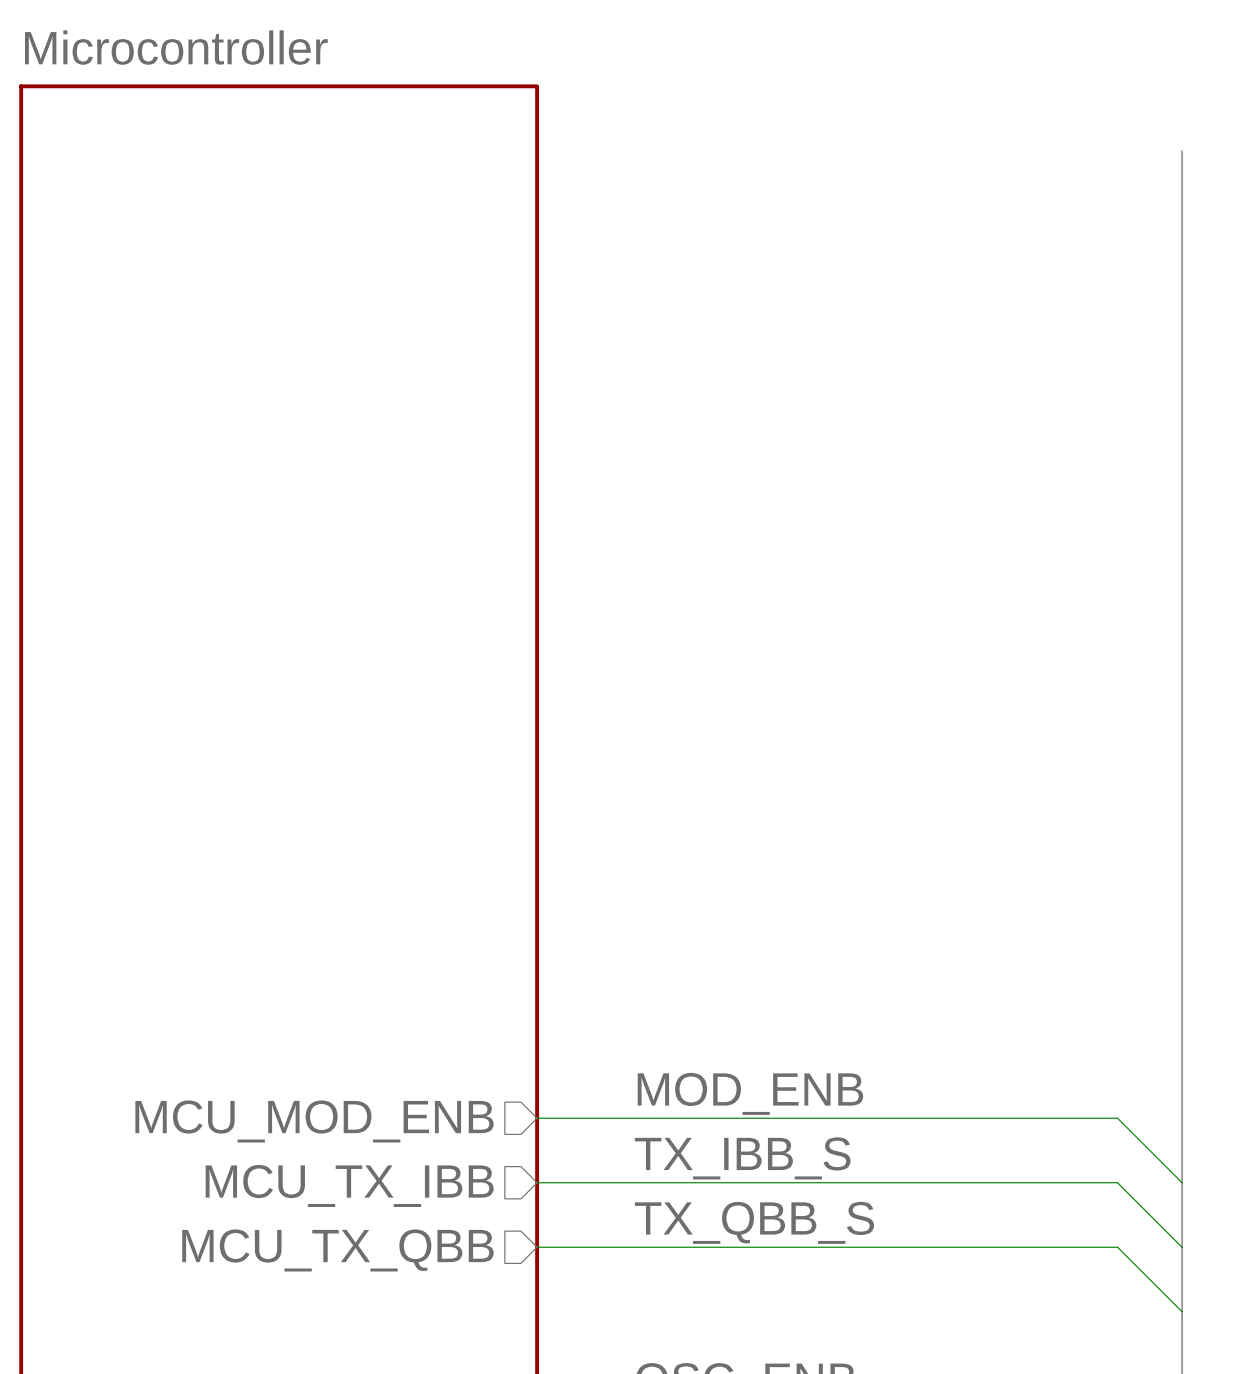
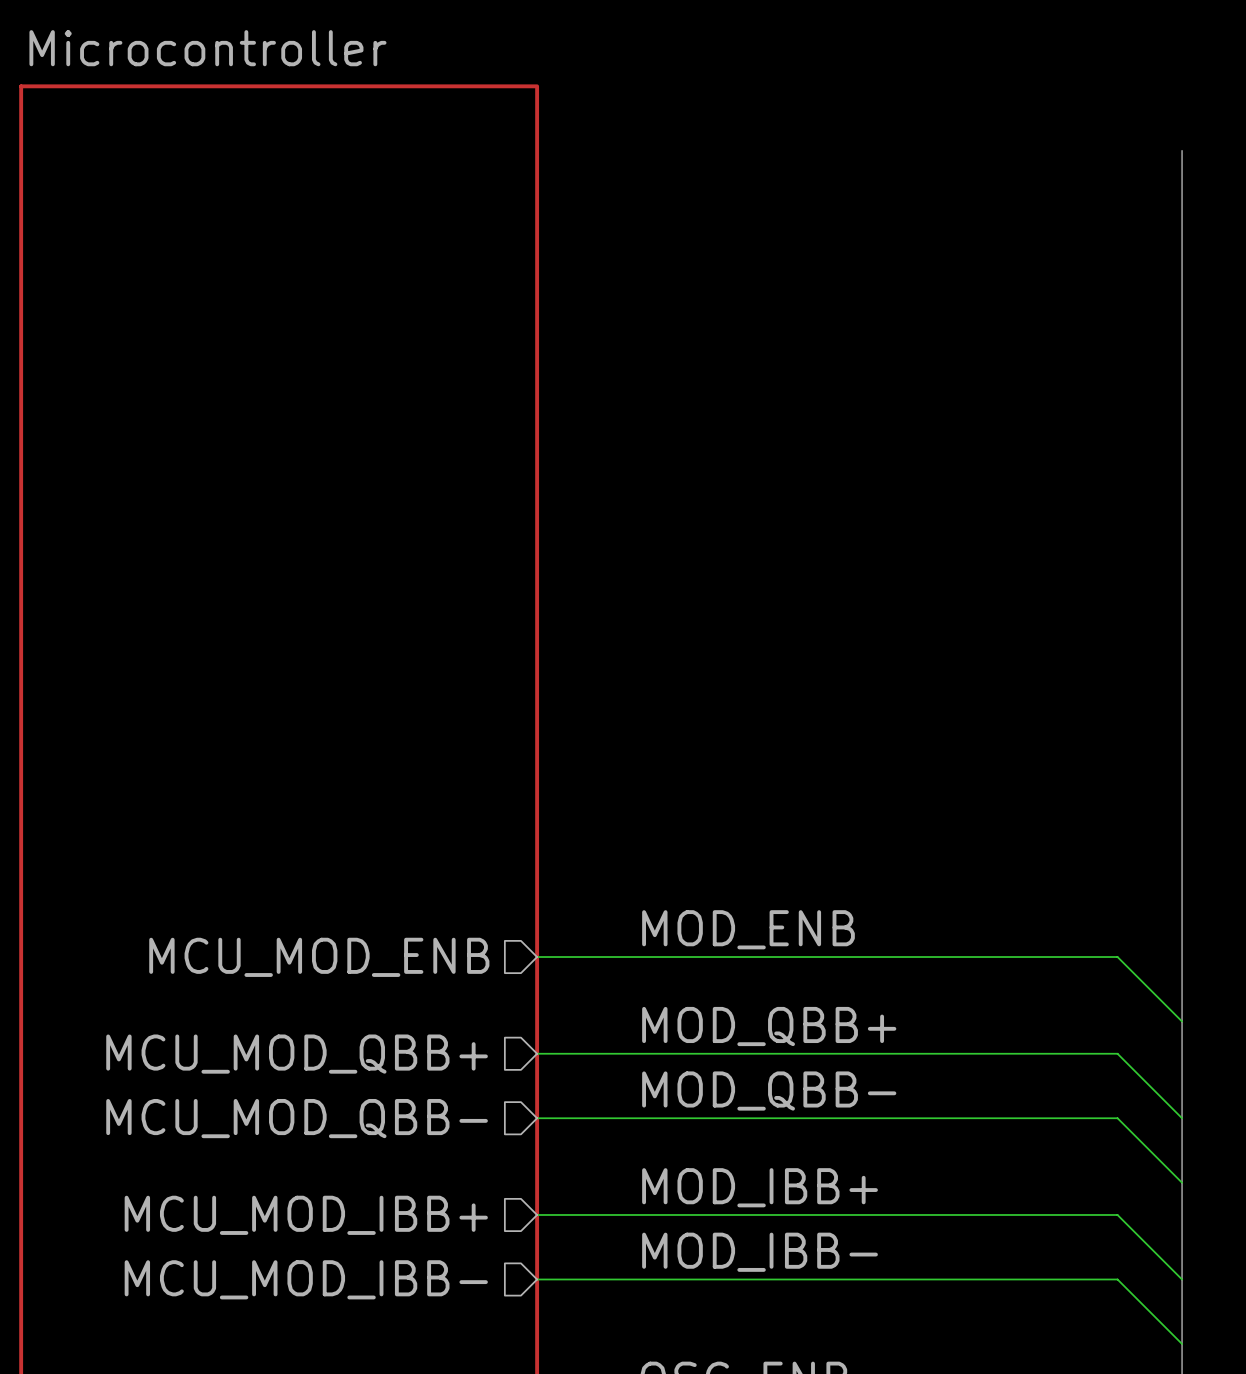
label: none -> MOD_ENB (748, 929)
wire: none -> (537, 957) (1117, 957) (1182, 1021)
sheet pin: none -> MCU_MOD_ENB (319, 957)
label: none -> MOD_QBB+ (769, 1026)
wire: none -> (537, 1053) (1117, 1053) (1182, 1118)
sheet pin: none -> MCU_MOD_QBB+ (297, 1054)
label: MOD_ENB (750, 1093) -> MOD_QBB- (769, 1091)
sheet pin: MCU_MOD_ENB (314, 1121) -> MCU_MOD_QBB- (297, 1118)
label: TX_IBB_S (742, 1158) -> none
wire: (537, 1182) (1117, 1182) (1182, 1247) -> (537, 1214) (1117, 1214) (1182, 1279)
sheet pin: MCU_TX_IBB (349, 1185) -> none
label: none -> MOD_IBB+ (760, 1187)
sheet pin: none -> MCU_MOD_IBB+ (306, 1215)
label: TX_QBB_S (754, 1222) -> none
wire: (537, 1247) (1117, 1247) (1182, 1311) -> (537, 1279) (1117, 1279) (1182, 1343)
sheet pin: MCU_TX_QBB (337, 1250) -> none
label: none -> MOD_IBB- (760, 1252)
sheet pin: none -> MCU_MOD_IBB- (306, 1279)

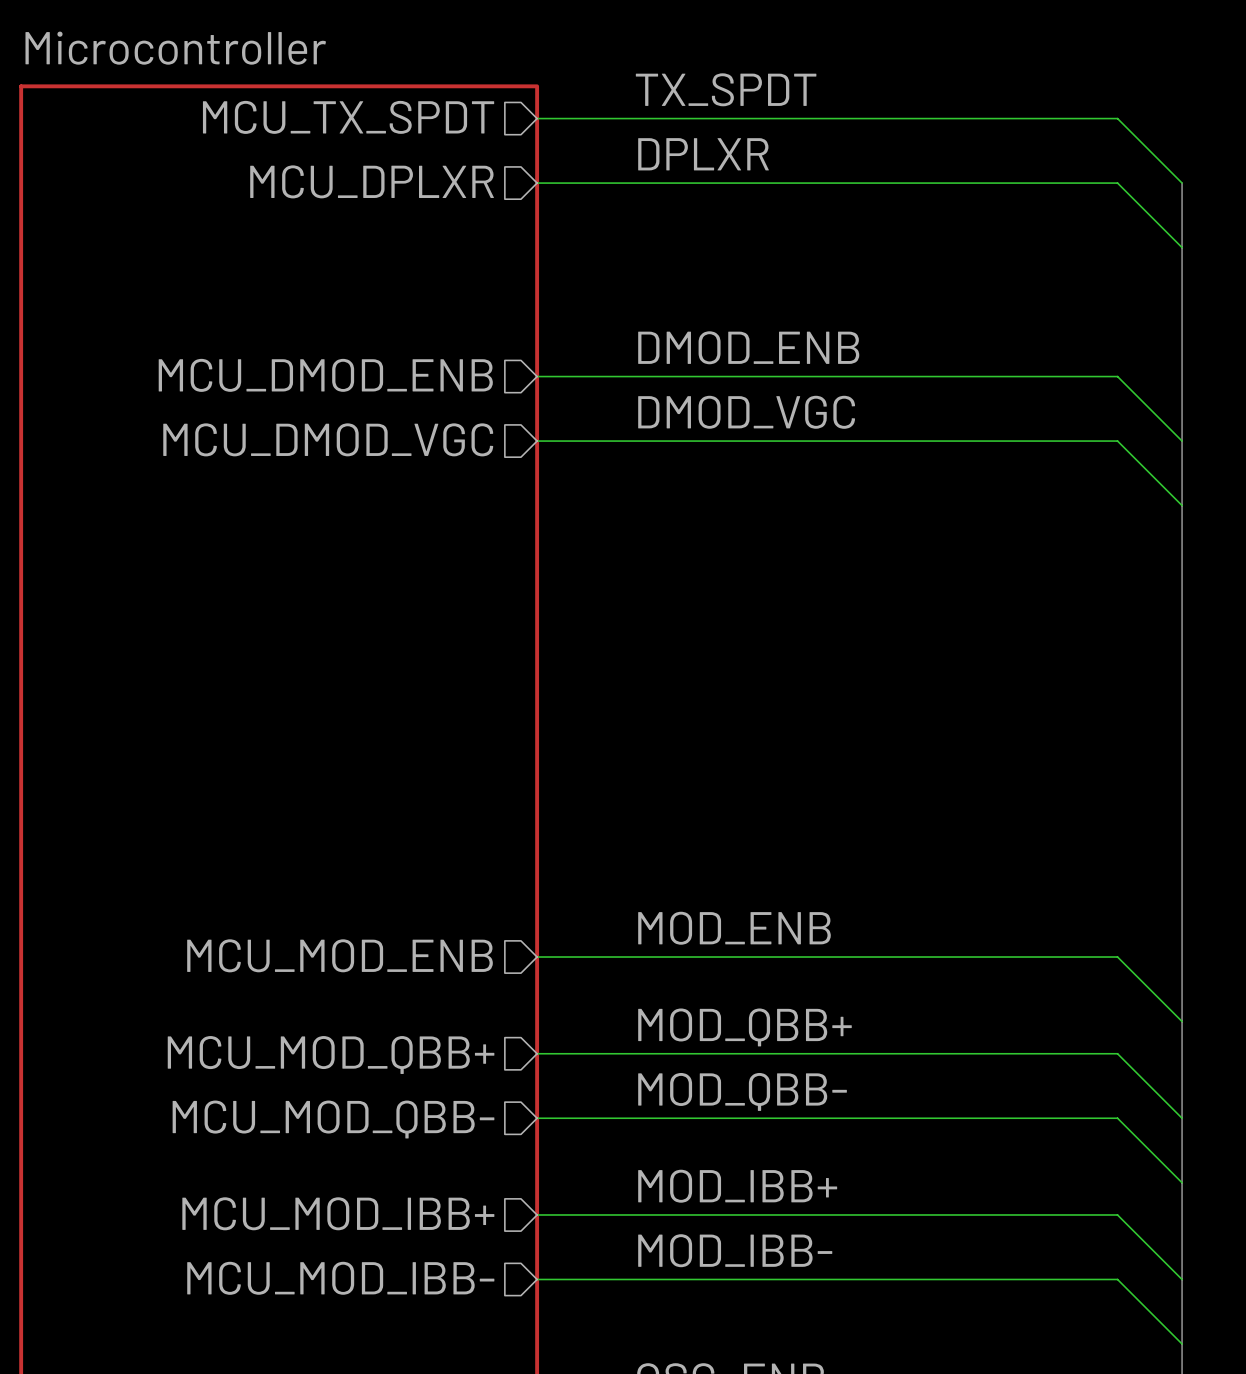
label: none -> TX_SPDT (726, 89)
sheet pin: none -> MCU_TX_SPDT (348, 117)
wire: none -> (537, 118) (1117, 118) (1182, 183)
bus: (1182, 150) (1182, 183) -> none
label: none -> DPLXR (703, 154)
sheet pin: none -> MCU_DPLXR (372, 181)
wire: none -> (537, 183) (1117, 183) (1182, 247)
label: none -> DMOD_ENB (748, 347)
sheet pin: none -> MCU_DMOD_ENB (325, 375)
wire: none -> (537, 376) (1117, 376) (1182, 441)
label: none -> DMOD_VGC (746, 412)
sheet pin: none -> MCU_DMOD_VGC (328, 439)
wire: none -> (537, 441) (1117, 441) (1182, 505)

